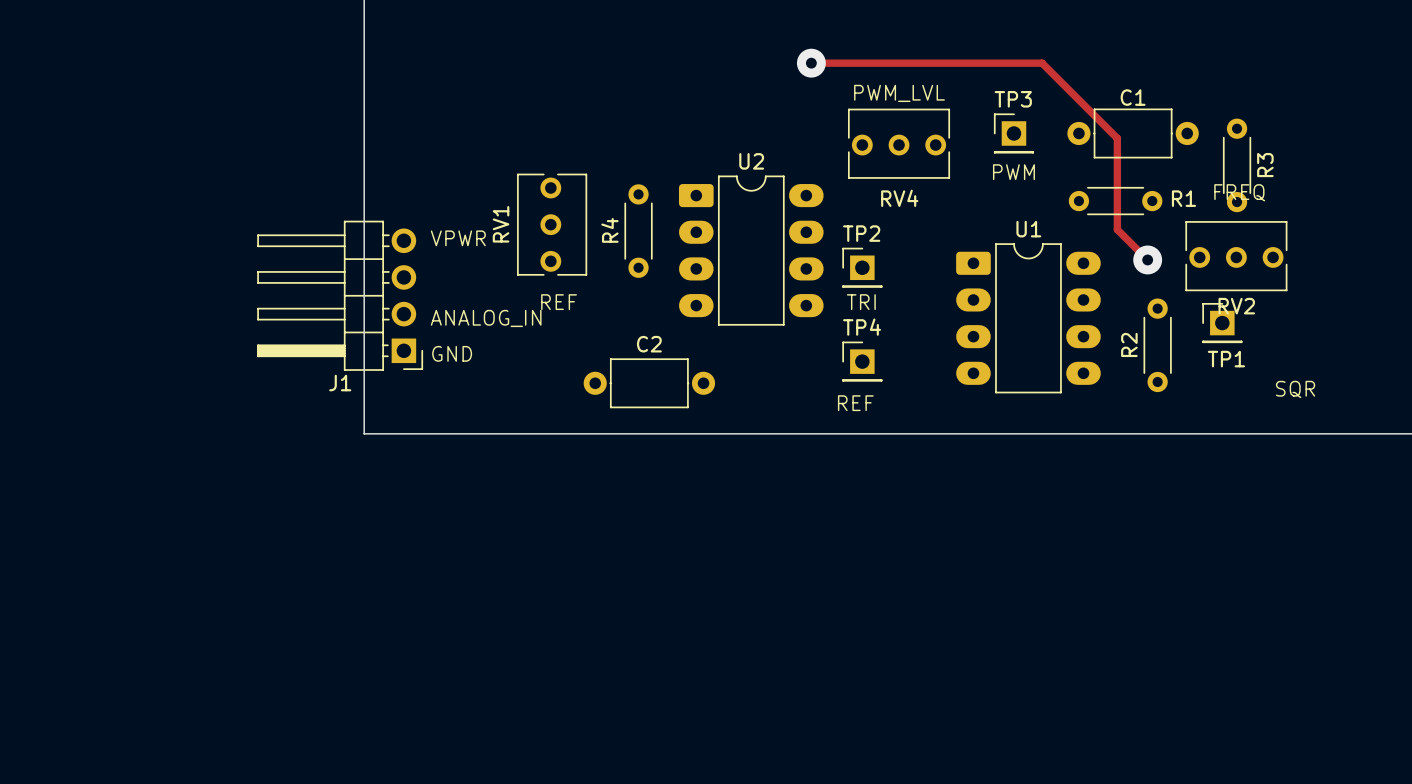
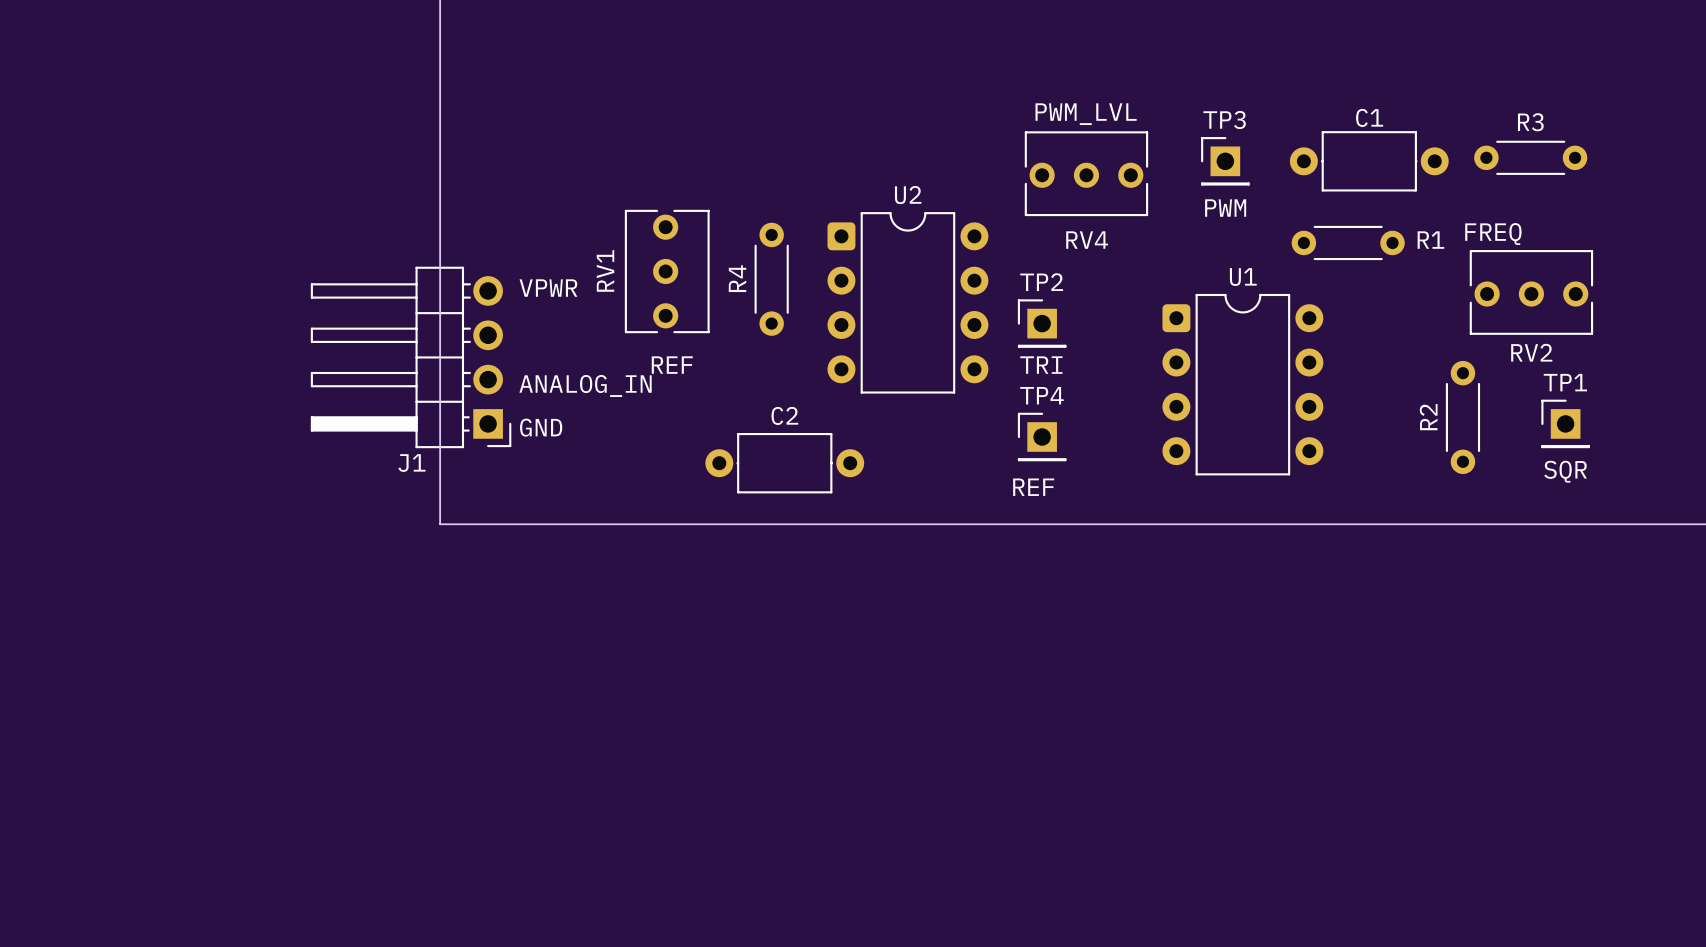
track: (811, 63) (1042, 63) (1117, 138) (1117, 229) (1147, 259) -> none
via: (811, 63) -> none
R3 rotation: 0° (1237, 165) -> 90° clockwise (1530, 157)
R3 name position: R3 (1265, 165) -> R3 (1530, 122)
U2 footprint: [678, 175, 824, 326] -> [827, 212, 989, 394]
U1 footprint: [956, 243, 1101, 394] -> [1162, 293, 1324, 476]
RV2 position: (1236, 256) -> (1531, 292)
via: (1147, 259) -> none
TP1 position: (1222, 323) -> (1565, 423)
R2 position: (1157, 345) -> (1462, 417)
TP1 name position: TP1 (1226, 359) -> TP1 (1565, 382)

